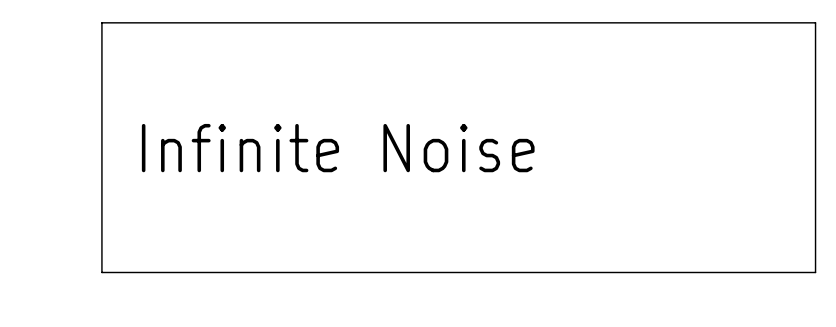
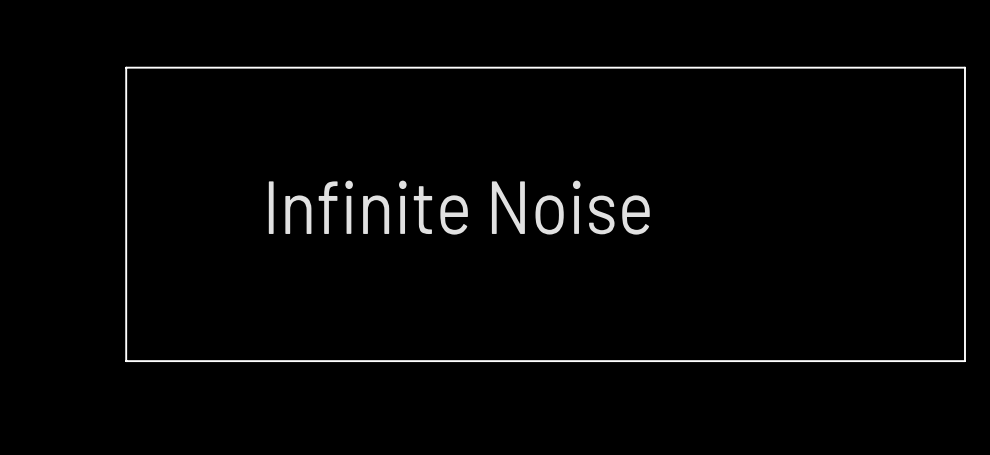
text position: Infinite Noise (338, 148) -> Infinite Noise (459, 207)

